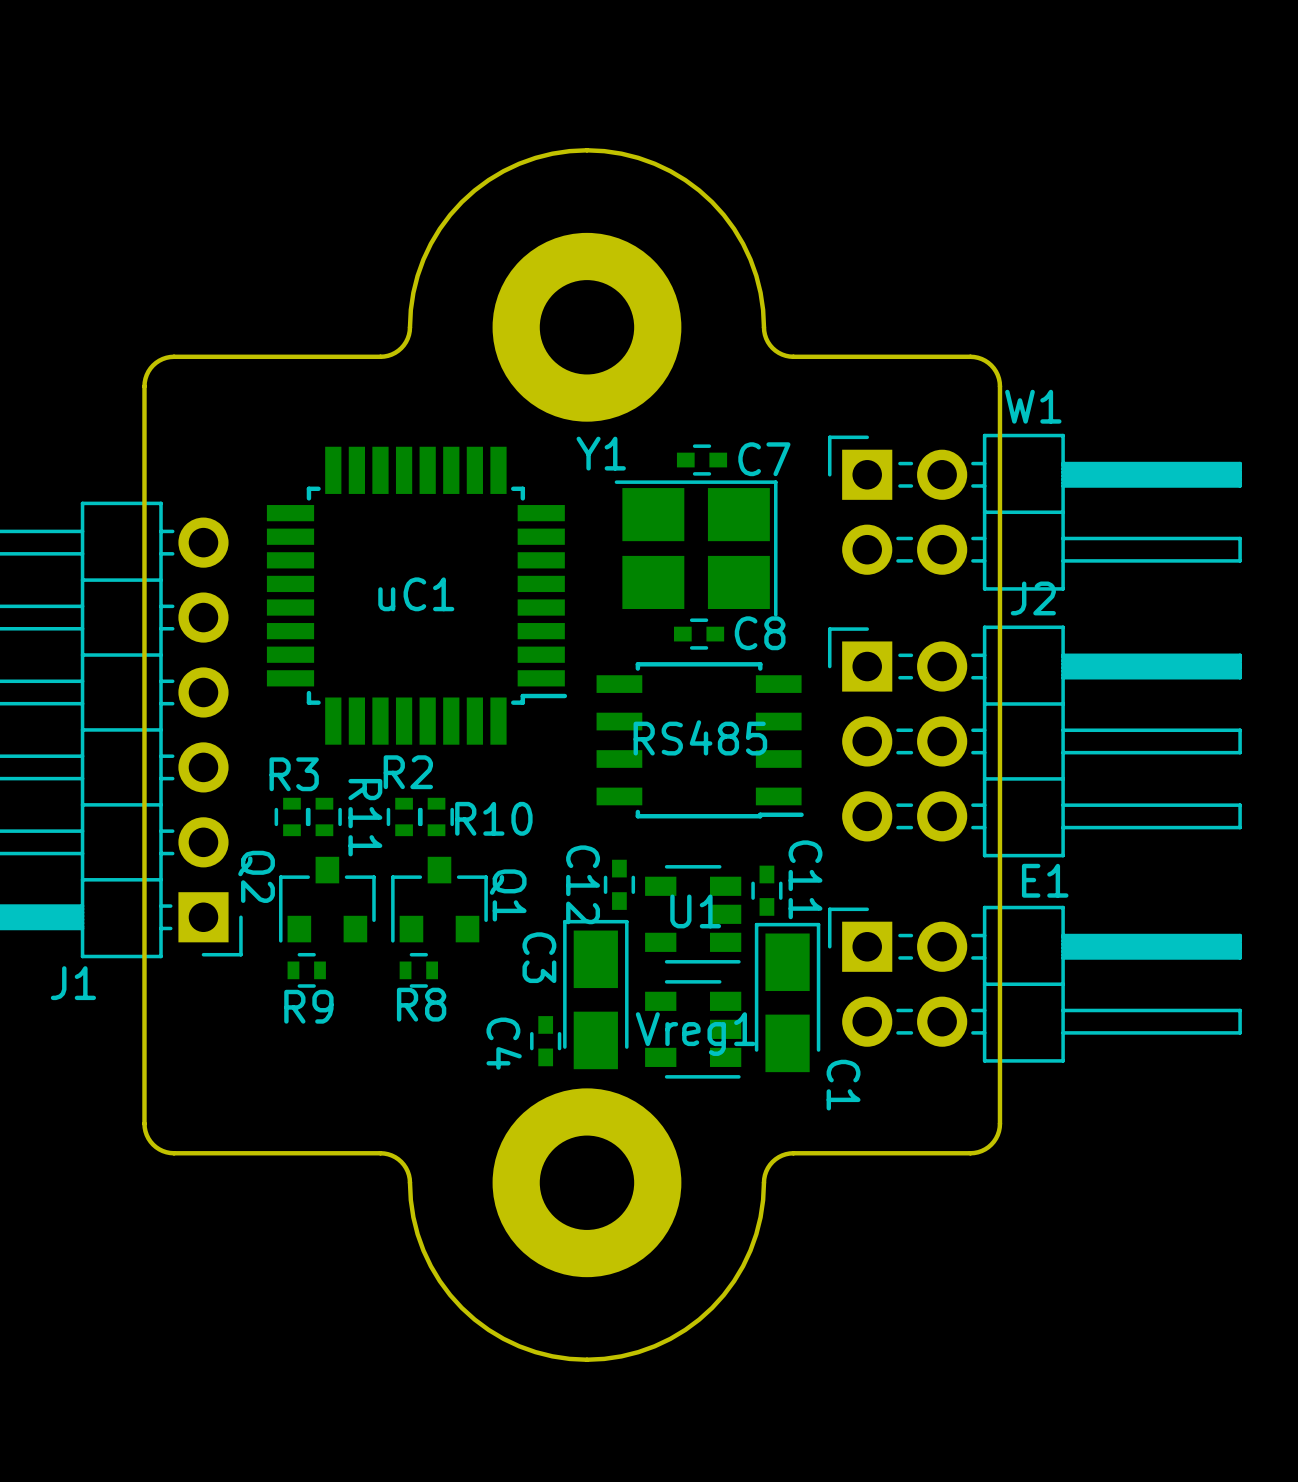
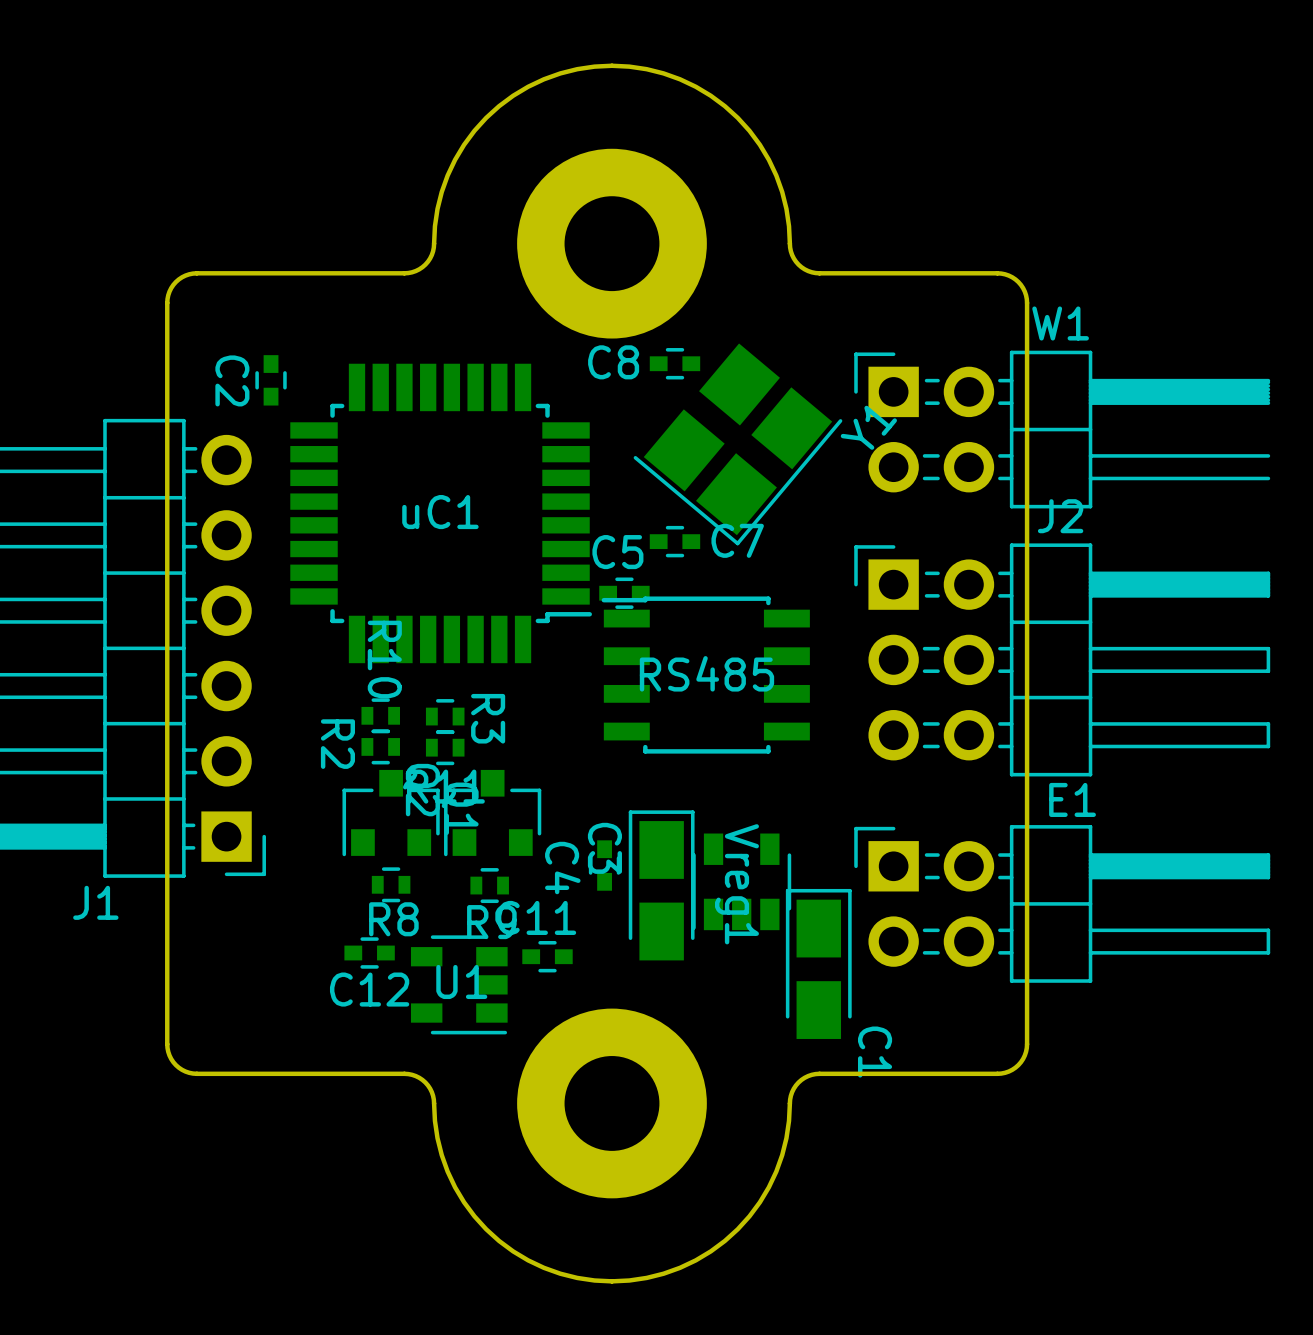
W1 footprint: [827, 433, 1242, 591] -> [854, 350, 1271, 509]
C7 position: (702, 460) -> (674, 541)
C2: none -> (271, 380)
Y1 rotation: 0° (696, 548) -> 130° clockwise (737, 444)
C8 name position: C8 (760, 633) -> C8 (613, 362)
C8 position: (699, 634) -> (674, 363)
C5: none -> (624, 593)
RS485 rotation: 0° (700, 740) -> 180° (705, 675)
R2 name position: R2 (408, 772) -> R2 (337, 744)
R3 rotation: 0° (291, 816) -> 90° clockwise (445, 716)
R3 position: (291, 816) -> (445, 716)
R11 rotation: 0° (324, 816) -> 90° clockwise (445, 747)
R11 position: (324, 816) -> (445, 747)
R2 rotation: 0° (404, 816) -> 90° clockwise (380, 746)
R2 position: (404, 816) -> (380, 746)
R10 rotation: 0° (436, 816) -> 90° clockwise (380, 715)
R10 position: (436, 816) -> (380, 715)
R10 name position: R10 (493, 818) -> R10 (384, 659)
C12 rotation: 0° (619, 884) -> 90° clockwise (369, 953)
C12 position: (619, 884) -> (369, 953)
C11 rotation: 0° (766, 890) -> 90° clockwise (547, 956)
C11 position: (766, 890) -> (547, 956)
Q2 position: (327, 899) -> (492, 813)
Q1 position: (439, 899) -> (391, 813)
U1 position: (693, 914) -> (459, 984)
R9 position: (306, 970) -> (489, 885)
R8 position: (418, 970) -> (391, 884)
C3 position: (595, 994) -> (661, 885)
C1 position: (787, 997) -> (818, 963)
Vreg1 rotation: 0° (693, 1029) -> 90° clockwise (741, 881)
Vreg1 position: (693, 1029) -> (741, 881)
C4 position: (545, 1041) -> (604, 865)

